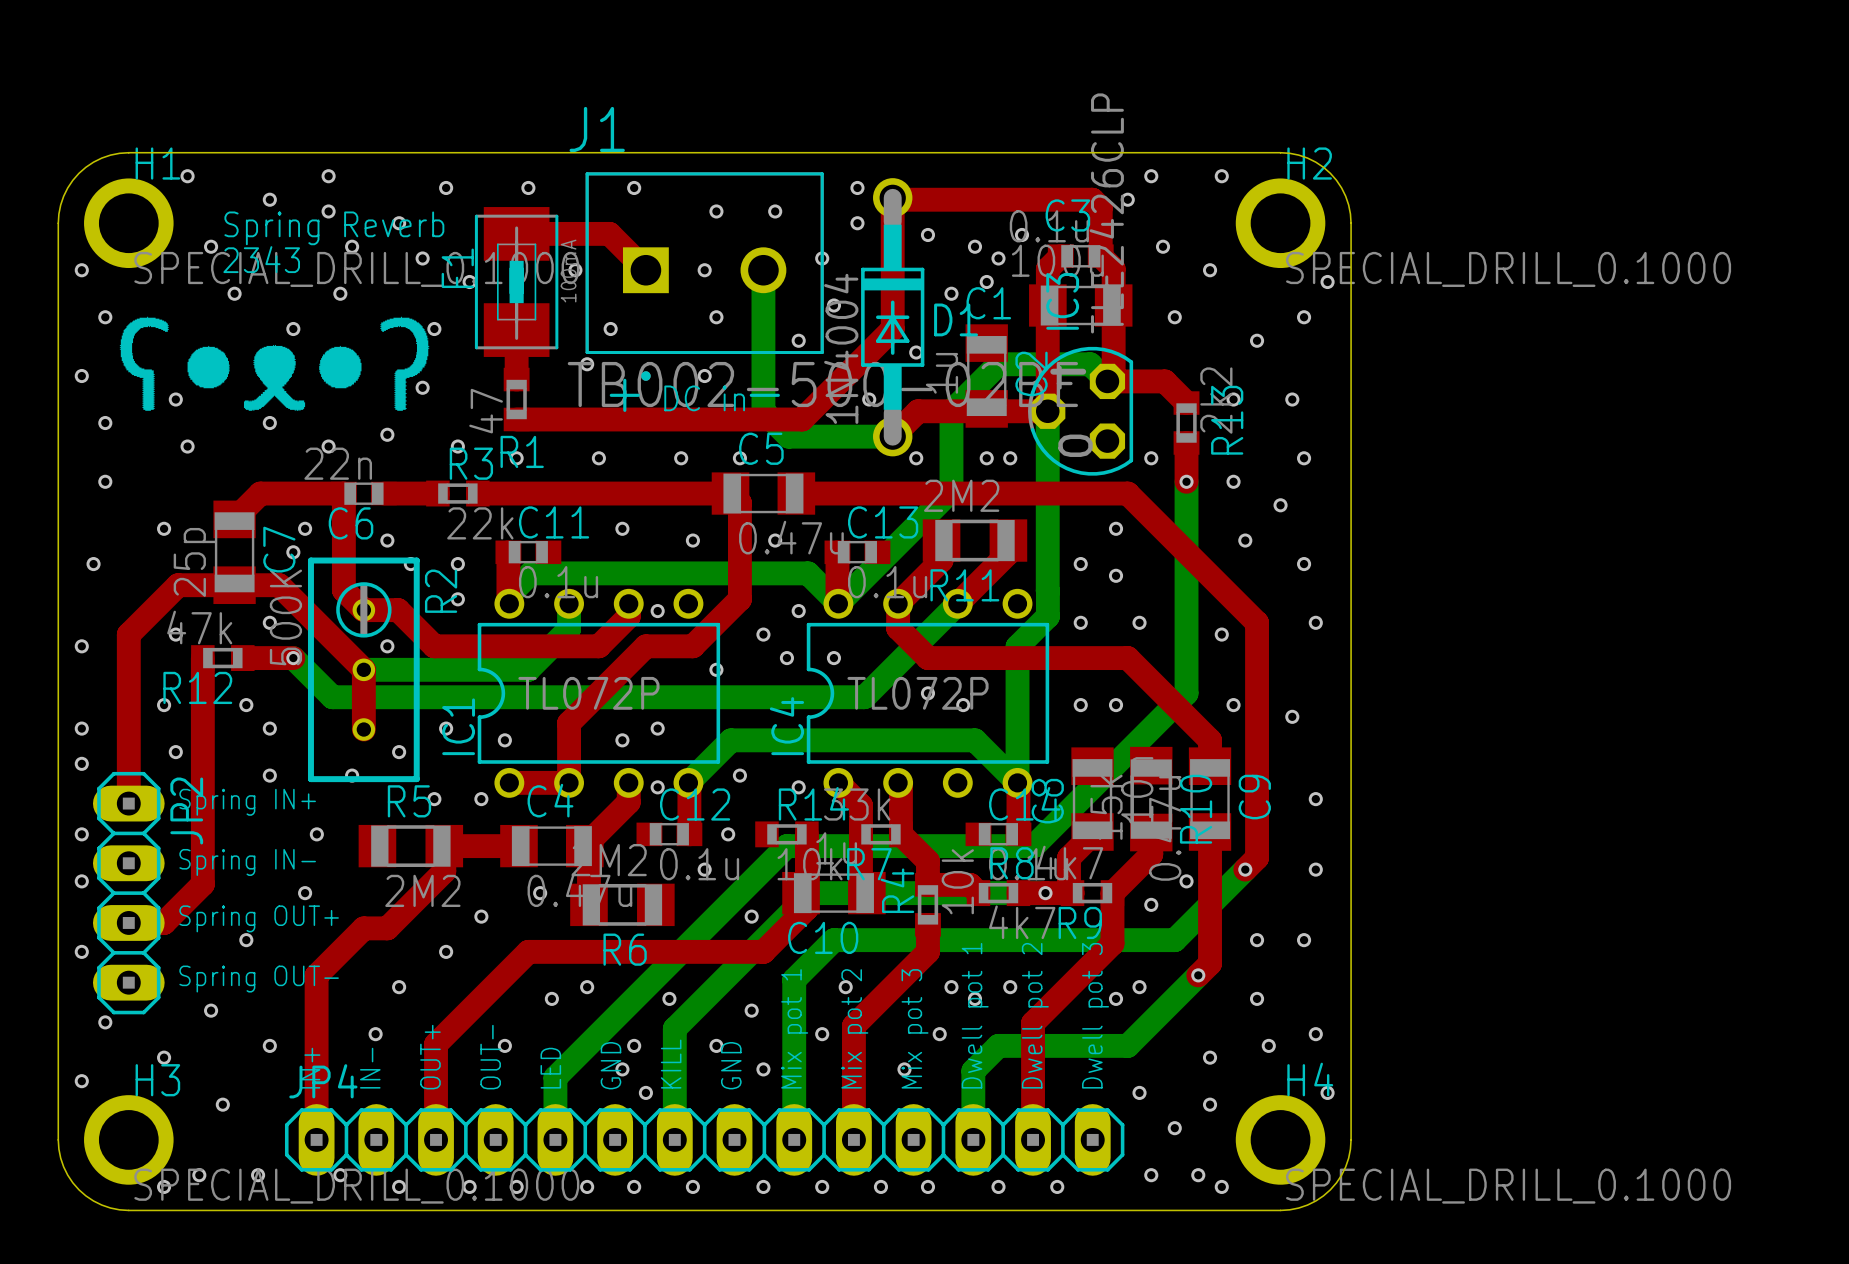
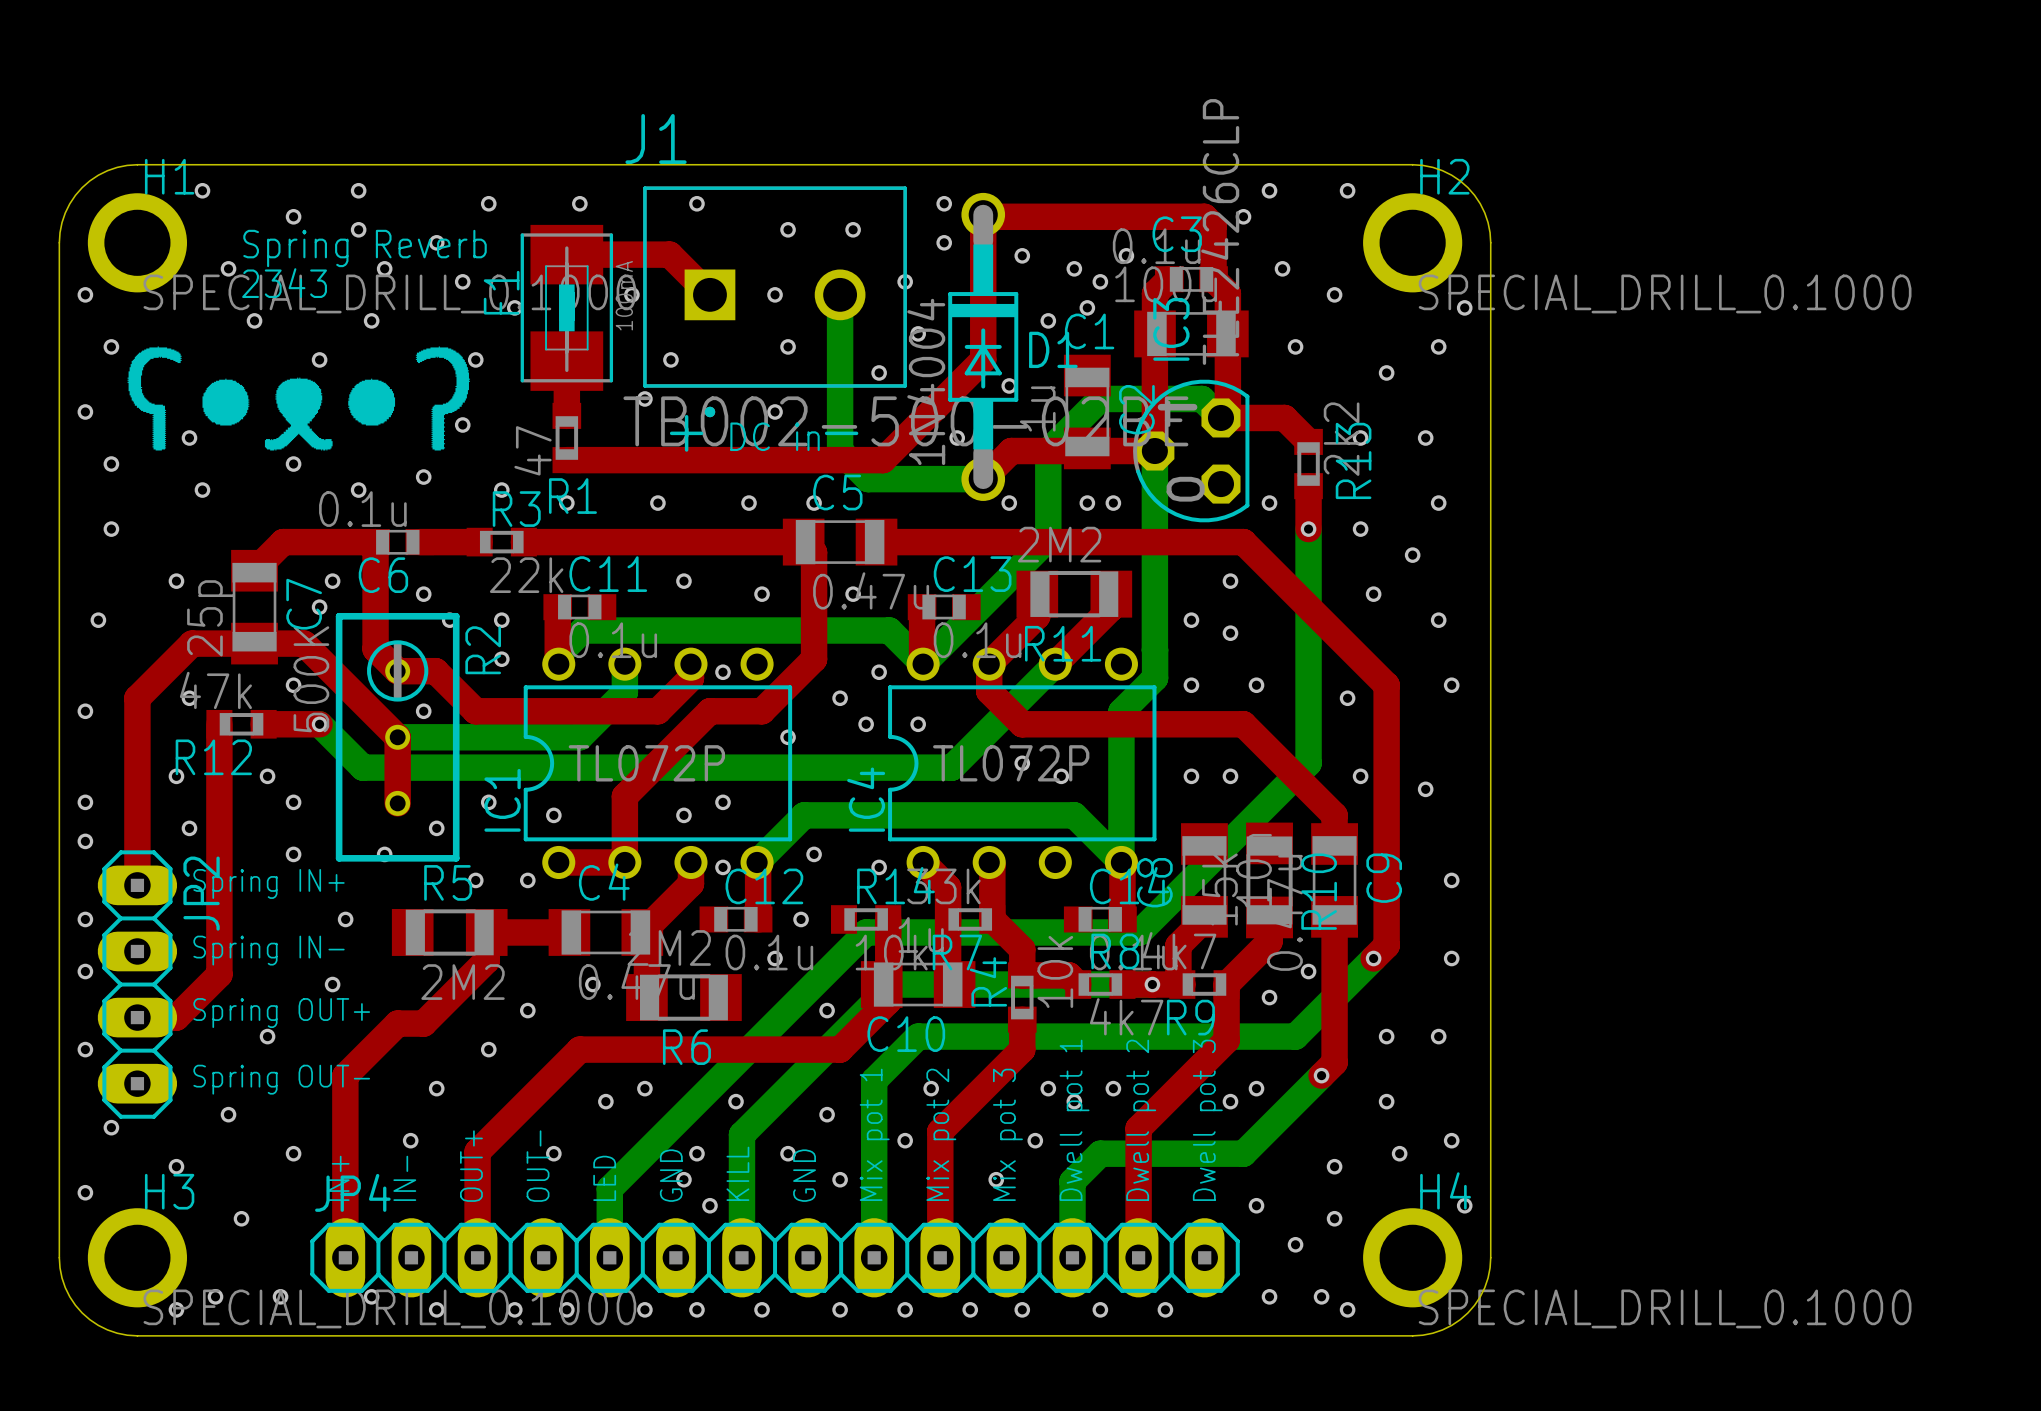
C6 value: 22n (338, 463) -> 0.1u (362, 509)

